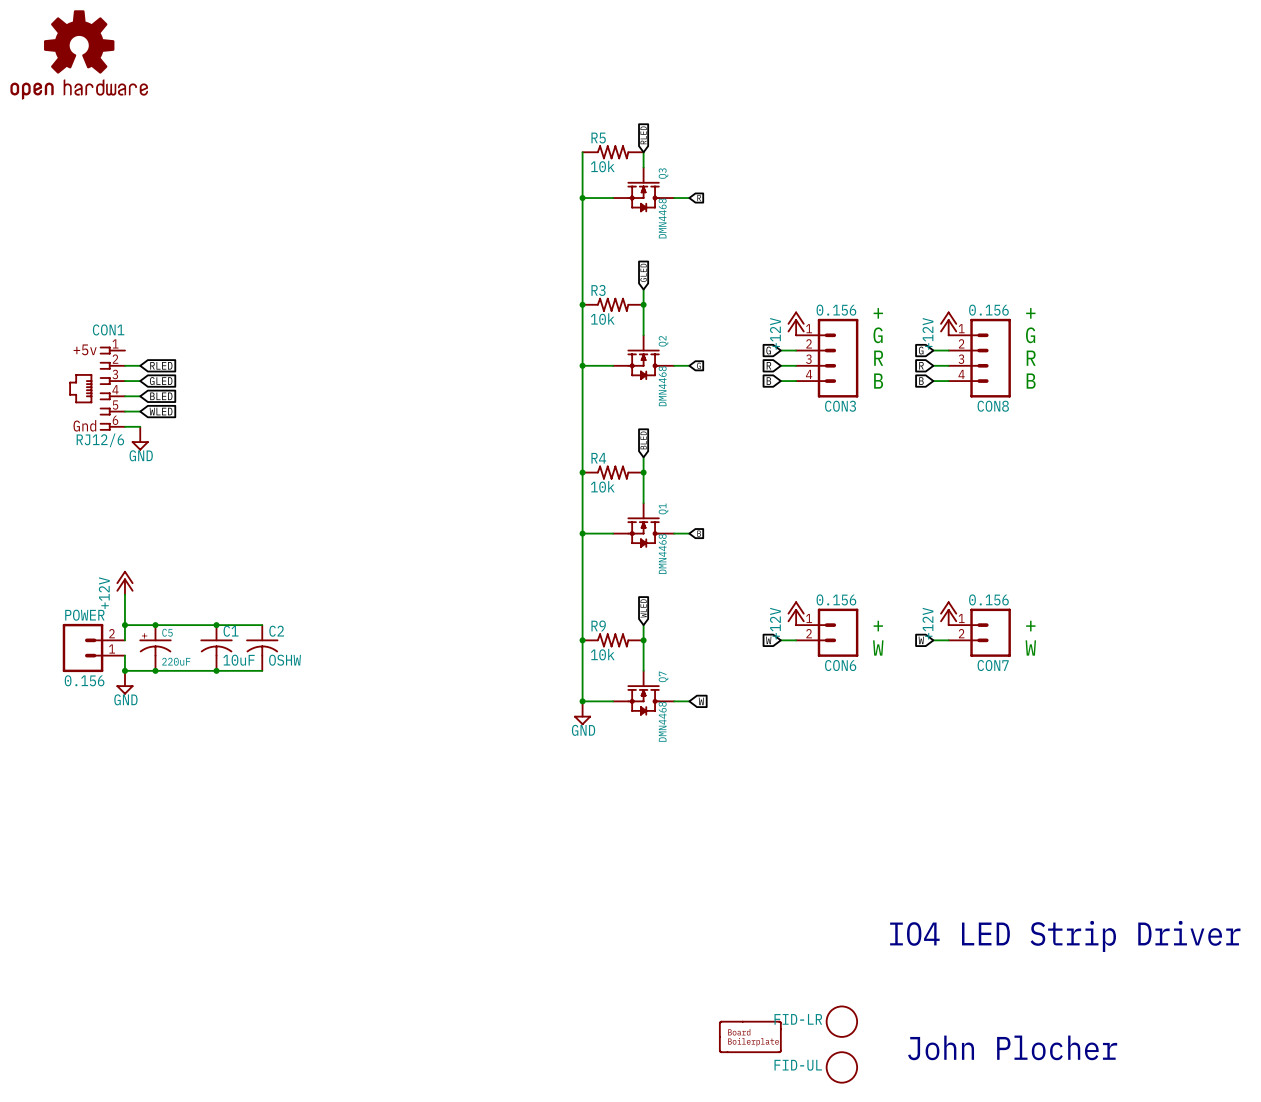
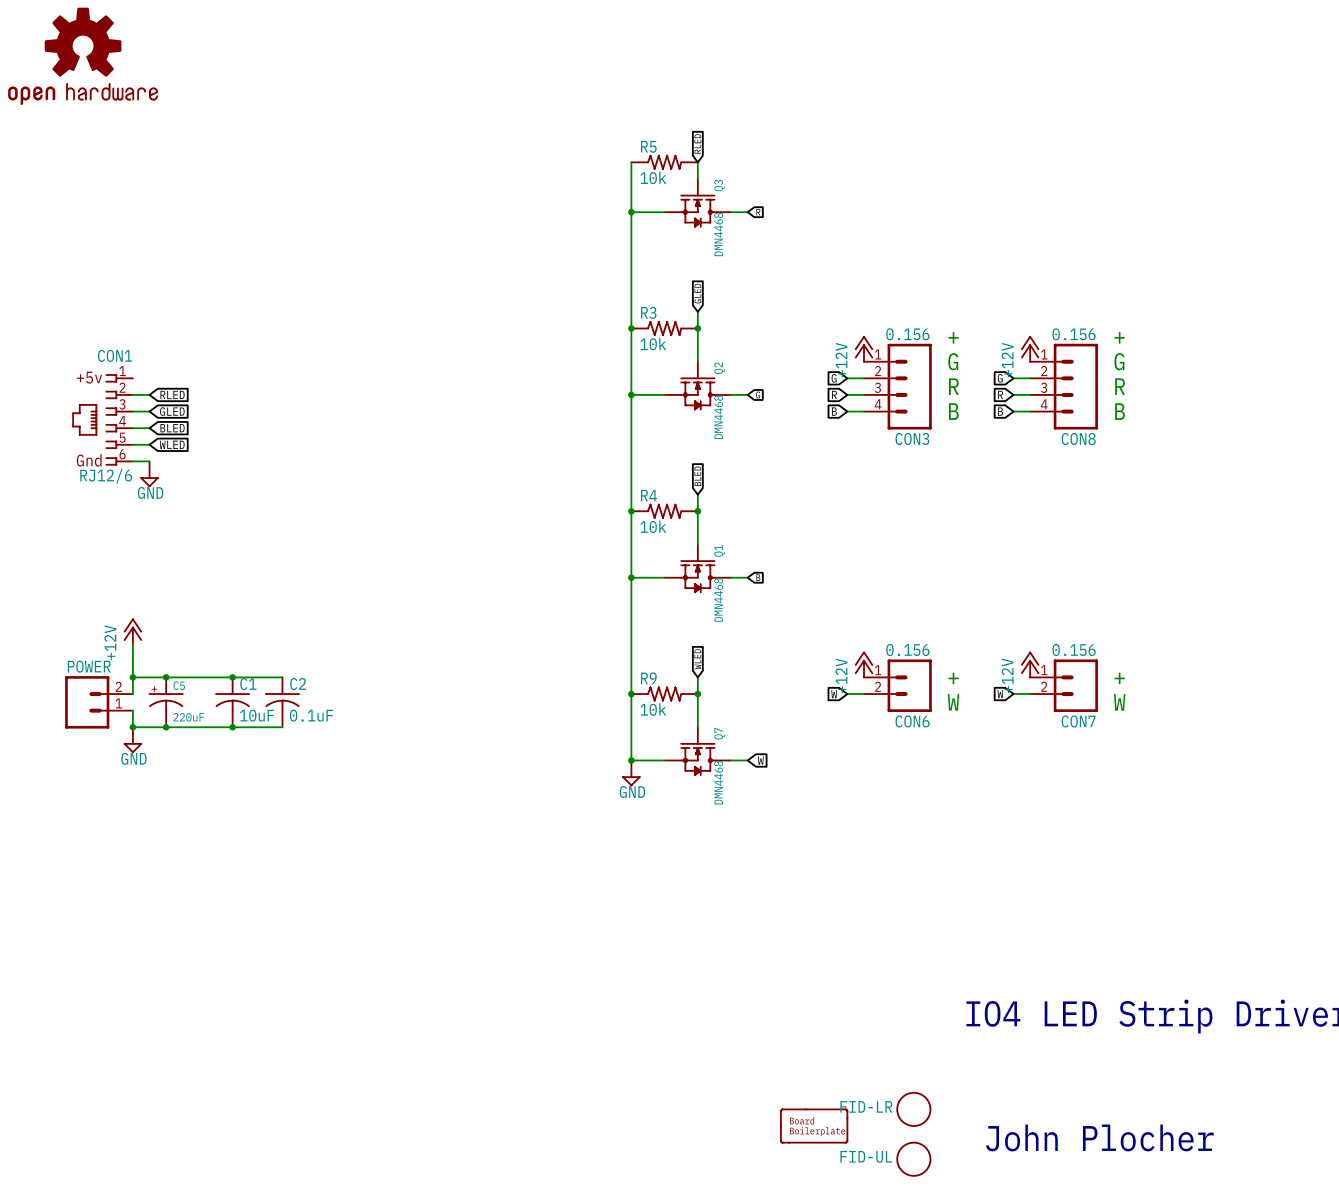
C2 value: OSHW (285, 660) -> 0.1uF (311, 715)
POWER value: 0.156 (84, 680) -> none

